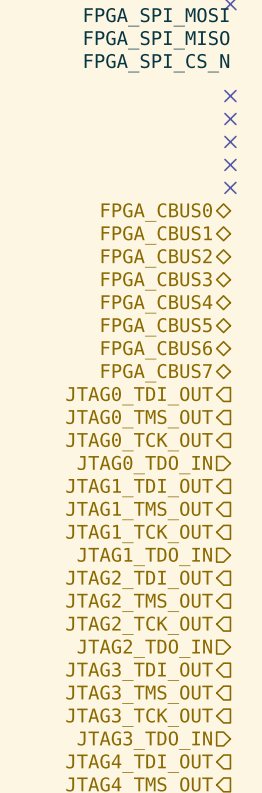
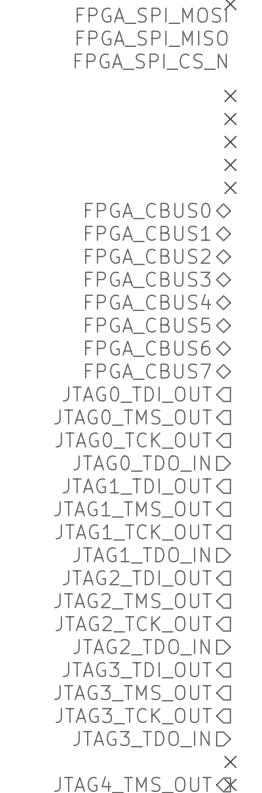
no-connect mark: none -> (230, 761)
hierarchical label: JTAG4_TDI_OUT (139, 763) -> none
no-connect mark: none -> (230, 784)

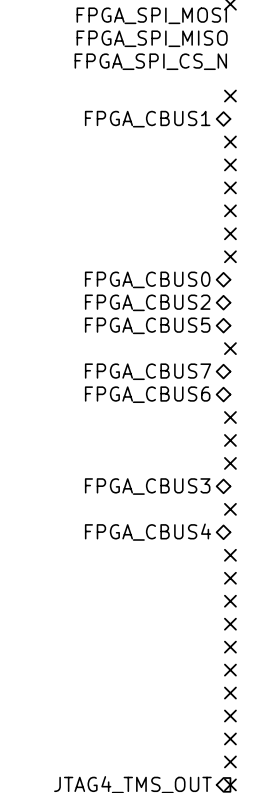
no-connect mark: (230, 118) -> none
hierarchical label: FPGA_CBUS0 (147, 210) -> none
no-connect mark: none -> (230, 210)
hierarchical label position: FPGA_CBUS1 (147, 233) -> FPGA_CBUS1 (147, 119)
no-connect mark: none -> (230, 233)
hierarchical label: FPGA_CBUS2 (147, 256) -> none
no-connect mark: none -> (230, 256)
hierarchical label: FPGA_CBUS3 (147, 279) -> FPGA_CBUS0 (147, 279)
hierarchical label: FPGA_CBUS4 (148, 302) -> FPGA_CBUS2 (147, 302)
hierarchical label: FPGA_CBUS6 (147, 348) -> none
no-connect mark: none -> (230, 348)
hierarchical label shape: output (137, 394) -> bidirectional (147, 394)
hierarchical label: JTAG0_TDI_OUT (137, 394) -> FPGA_CBUS6 (147, 394)
hierarchical label: JTAG0_TMS_OUT (132, 417) -> none
no-connect mark: none -> (230, 417)
hierarchical label: JTAG0_TCK_OUT (133, 440) -> none
no-connect mark: none -> (230, 440)
hierarchical label: JTAG0_TDO_IN (141, 463) -> none
no-connect mark: none -> (230, 463)
hierarchical label shape: output (137, 486) -> bidirectional (147, 486)
hierarchical label: JTAG1_TDI_OUT (137, 486) -> FPGA_CBUS3 (147, 486)
hierarchical label: JTAG1_TMS_OUT (132, 509) -> none
no-connect mark: none -> (230, 509)
hierarchical label shape: output (133, 532) -> bidirectional (148, 532)
hierarchical label: JTAG1_TCK_OUT (133, 532) -> FPGA_CBUS4 (148, 532)
hierarchical label: JTAG1_TDO_IN (141, 555) -> none
no-connect mark: none -> (230, 555)
hierarchical label: JTAG2_TDI_OUT (137, 578) -> none
no-connect mark: none -> (230, 578)
hierarchical label: JTAG2_TMS_OUT (132, 601) -> none
no-connect mark: none -> (230, 601)
hierarchical label: JTAG2_TCK_OUT (133, 624) -> none
no-connect mark: none -> (230, 624)
hierarchical label: JTAG2_TDO_IN (141, 647) -> none
no-connect mark: none -> (230, 647)
hierarchical label: JTAG3_TDI_OUT (137, 670) -> none
no-connect mark: none -> (230, 670)
hierarchical label: JTAG3_TMS_OUT (132, 693) -> none
no-connect mark: none -> (230, 693)
hierarchical label: JTAG3_TCK_OUT (133, 716) -> none
no-connect mark: none -> (230, 716)
no-connect mark: none -> (230, 738)
hierarchical label: JTAG3_TDO_IN (141, 739) -> none

